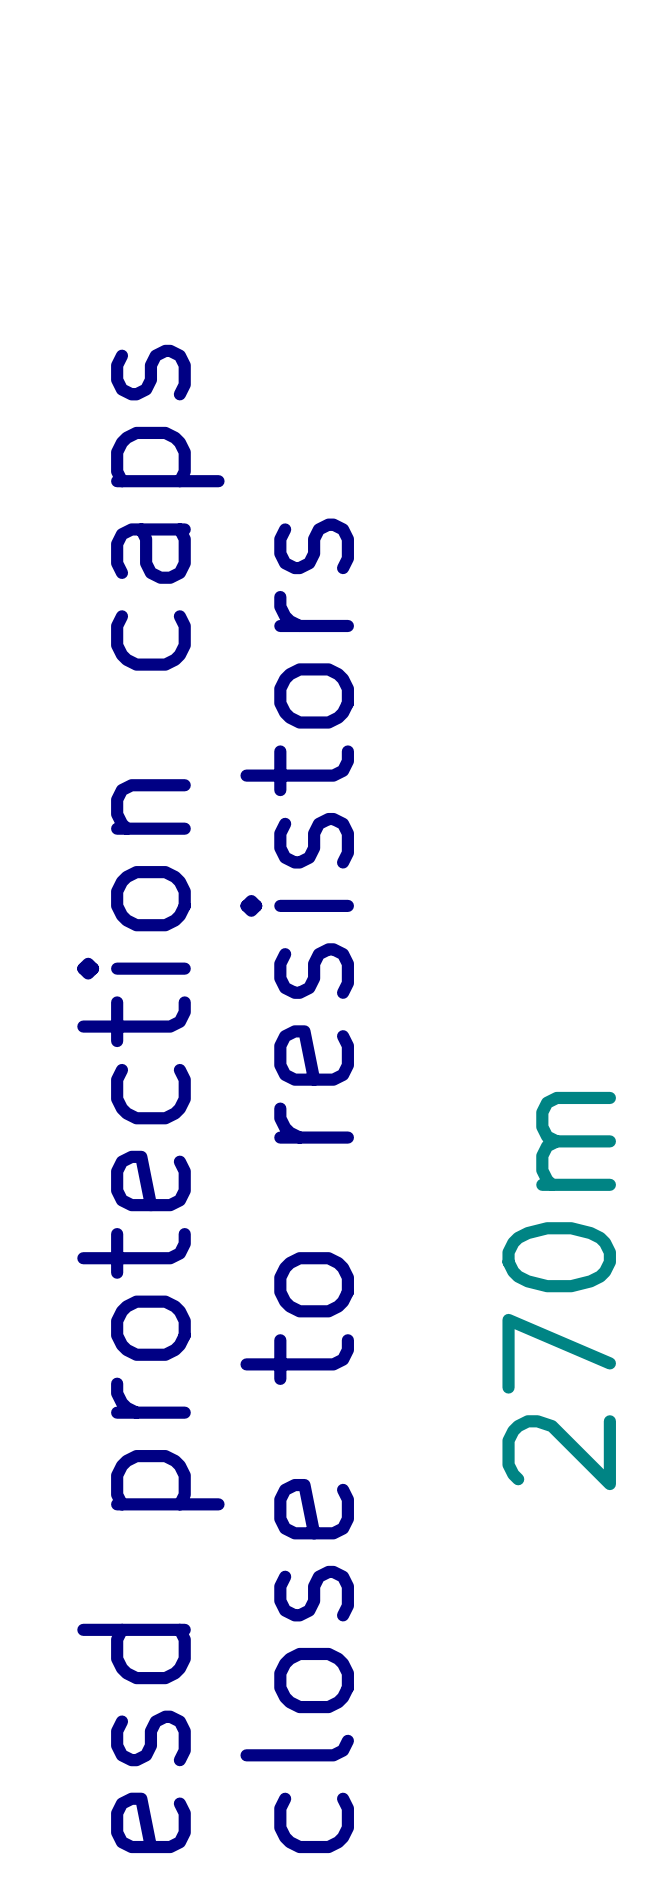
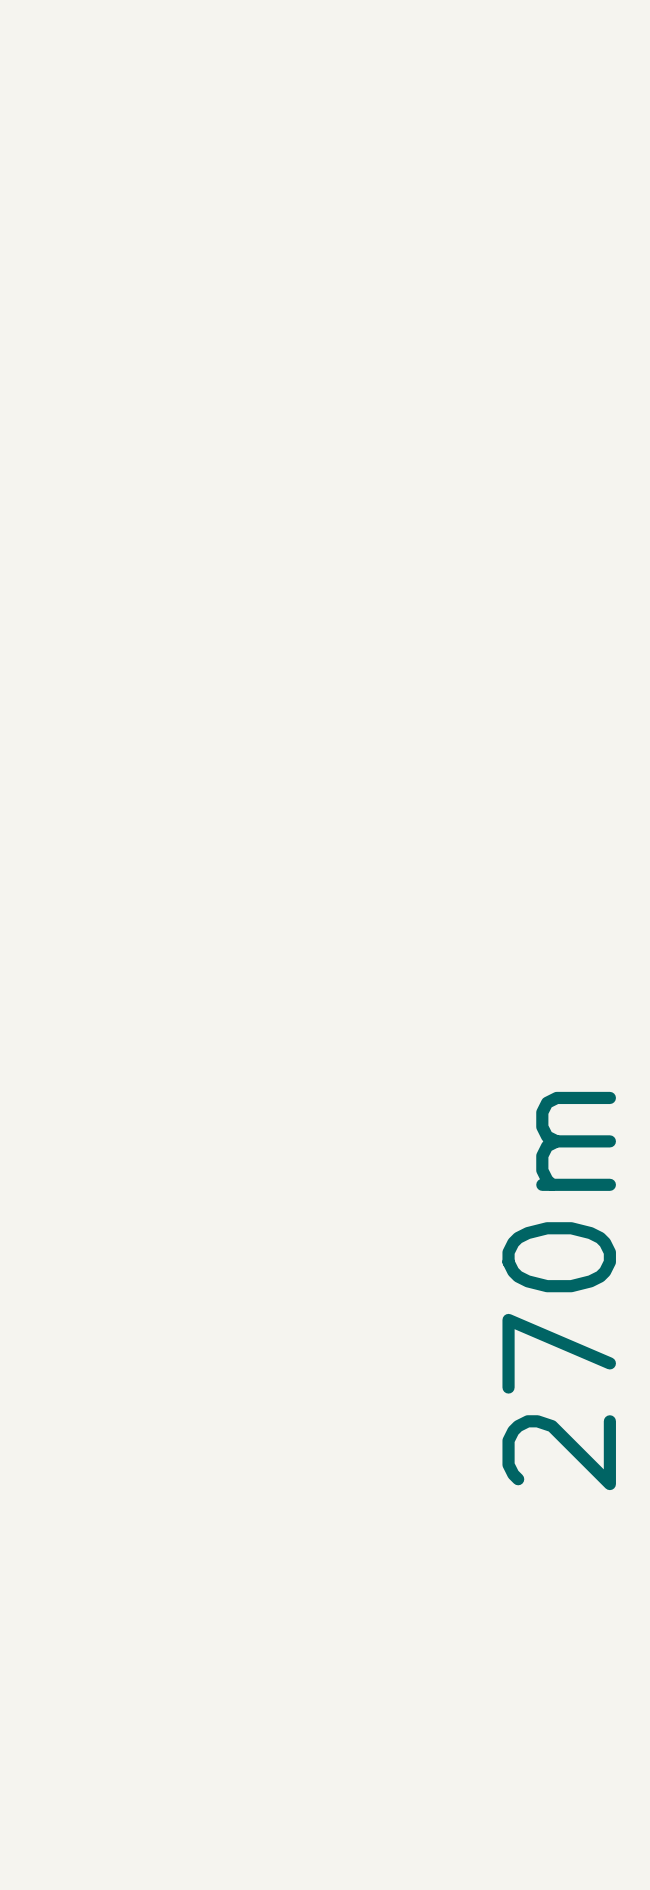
text: esd protection caps (150, 1098) -> none
text: close to resistors (297, 1185) -> none

